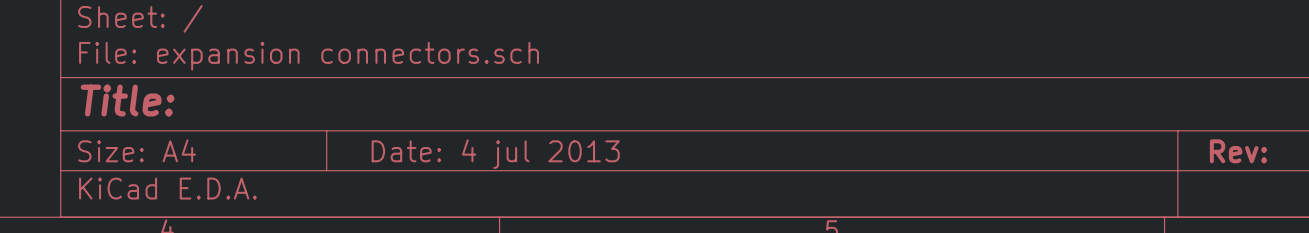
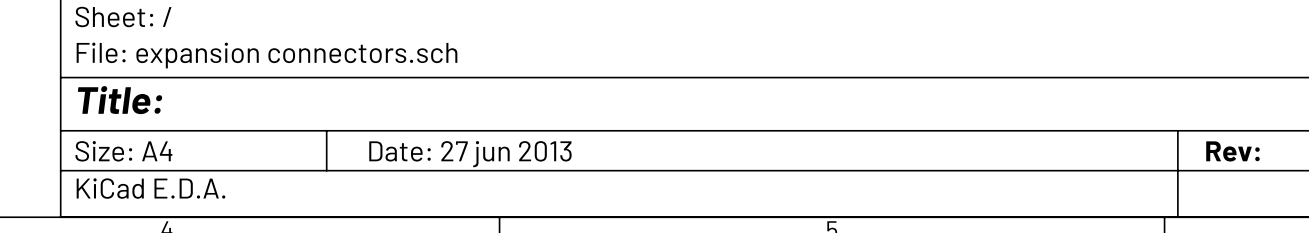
title block: Date: 4 jul 2013 (495, 154) -> Date: 27 jun 2013 (470, 154)

